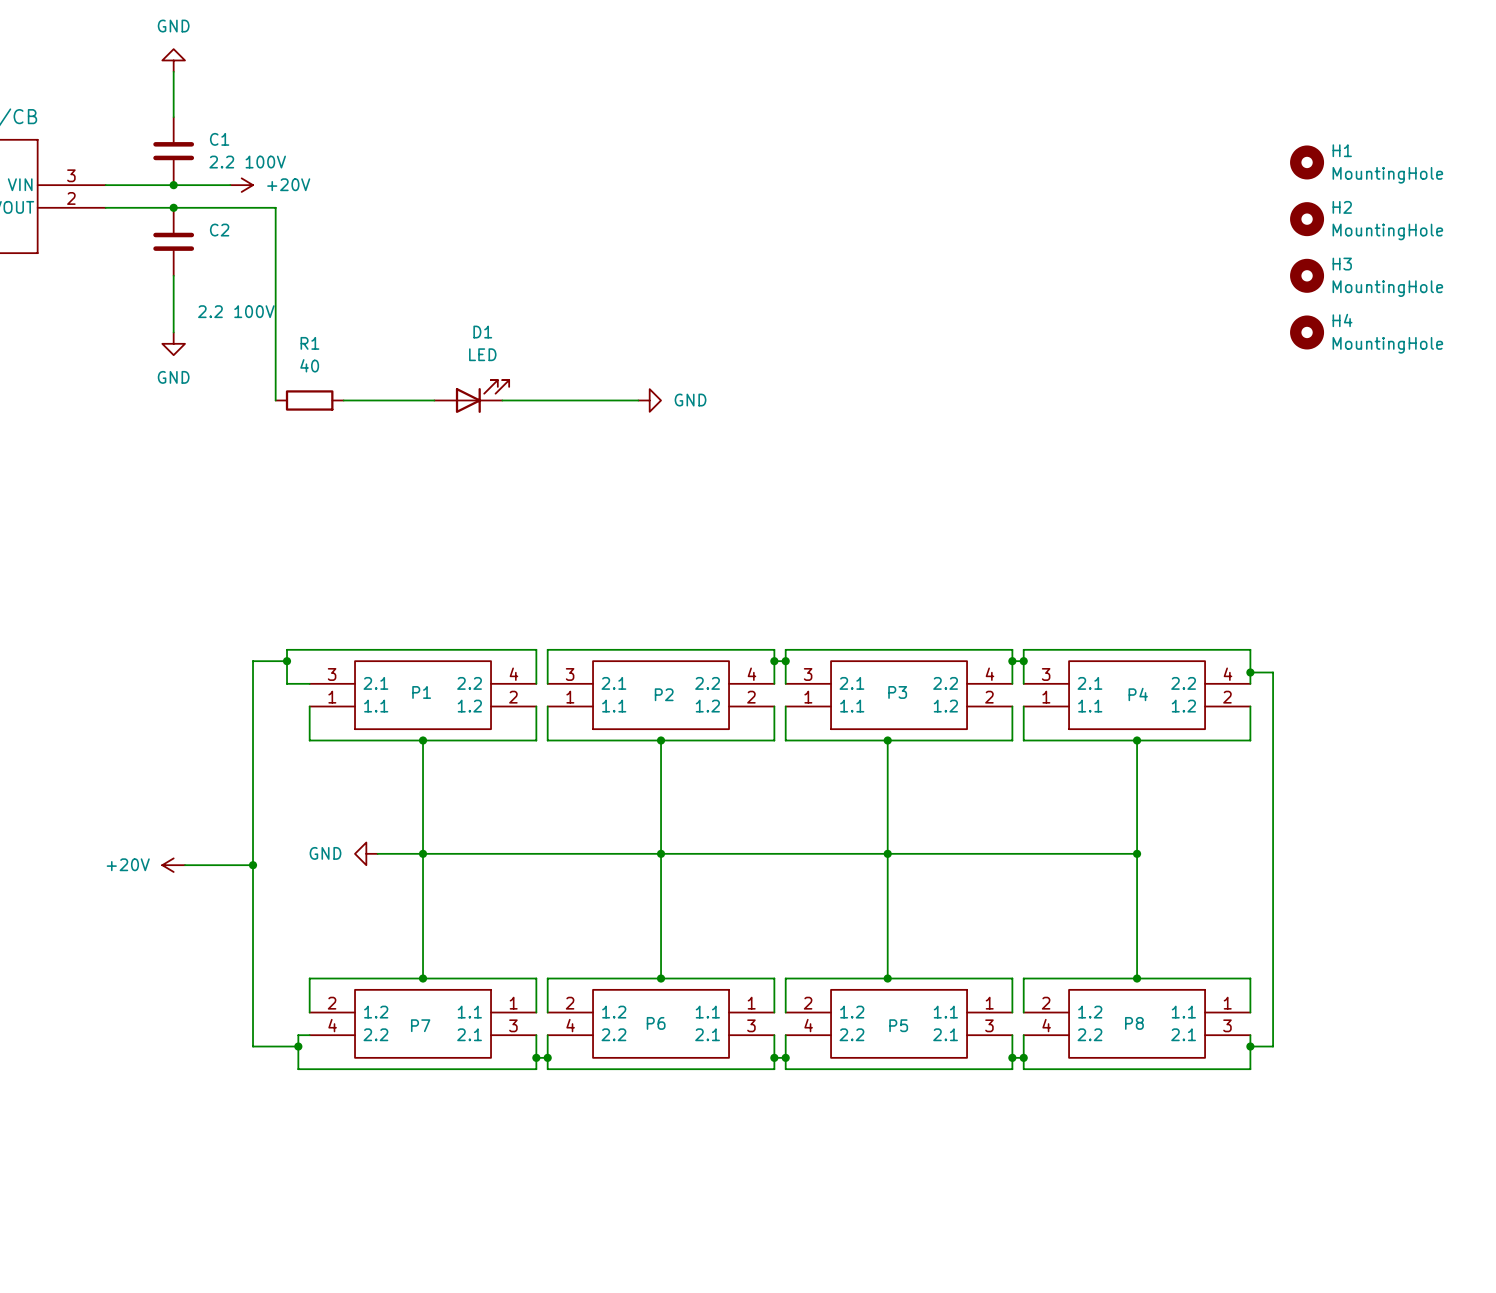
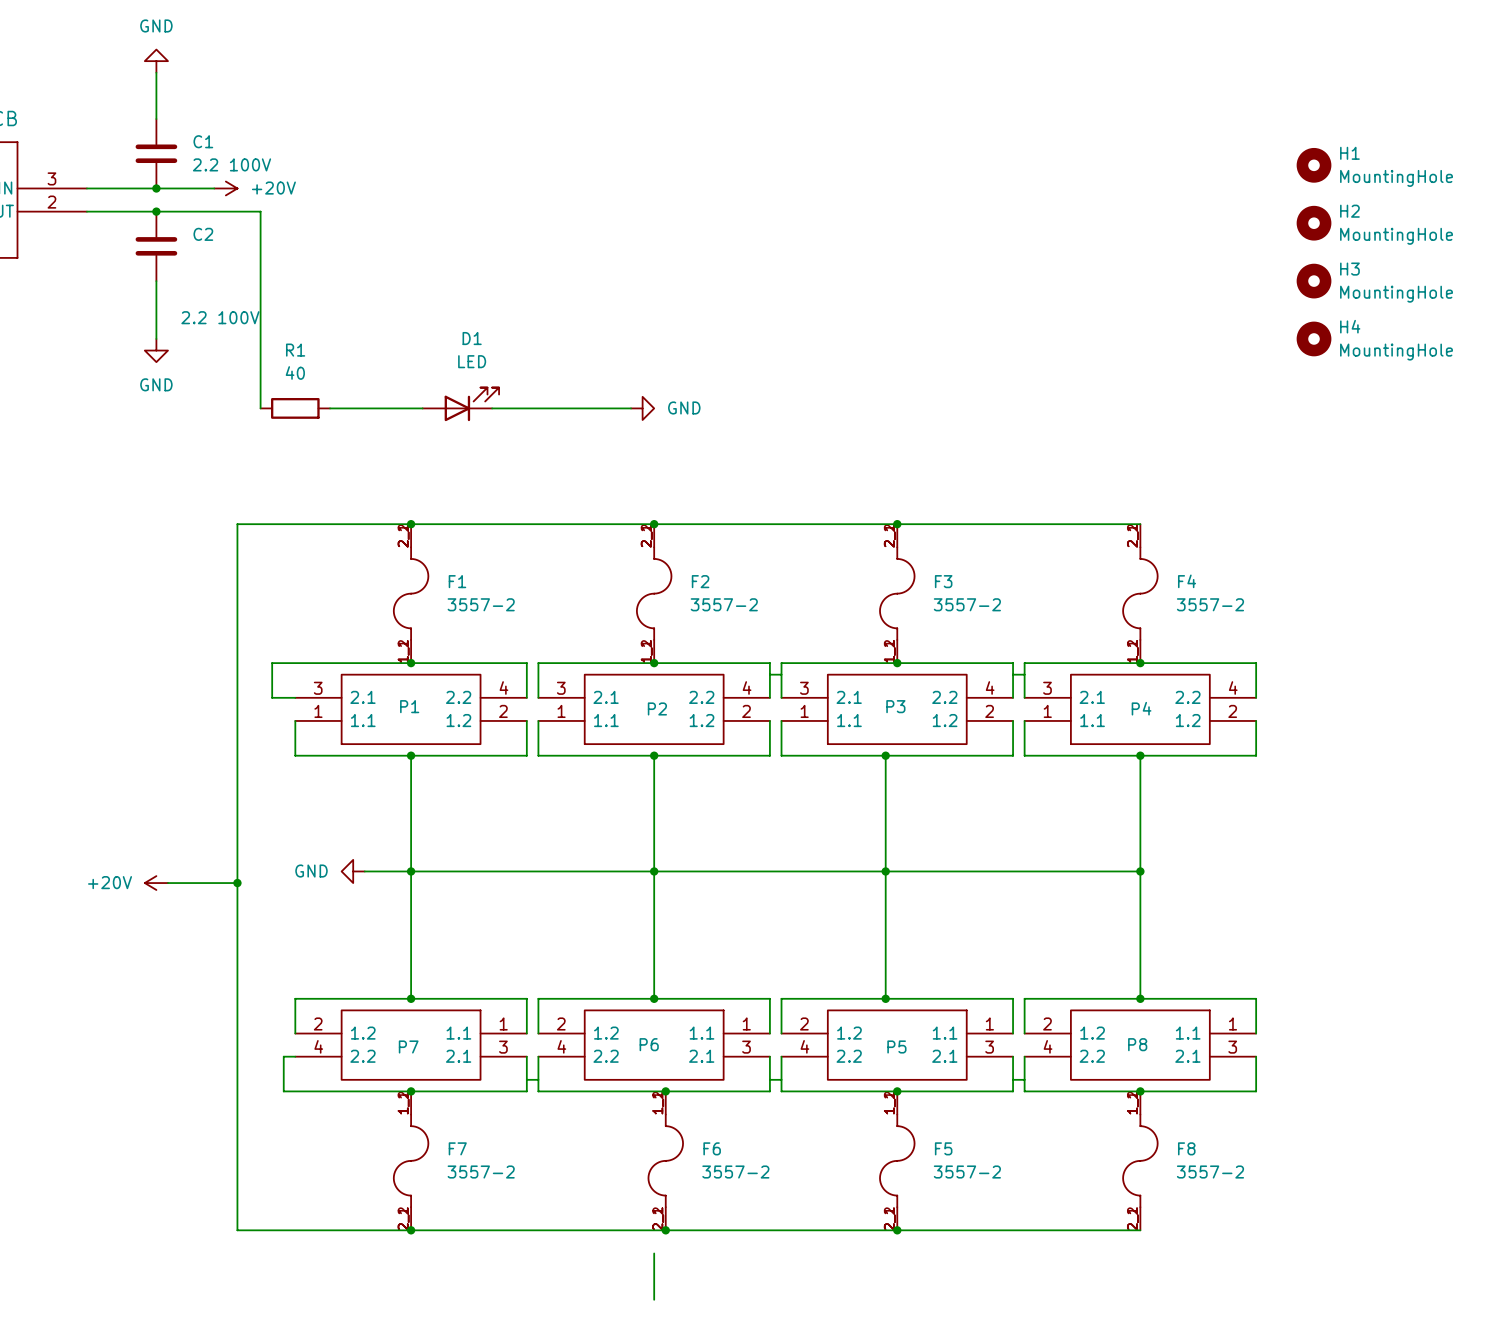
junction: none -> (411, 524)
junction: none -> (654, 524)
junction: none -> (897, 524)
F1: none -> 3557-2 (411, 593)
F2: none -> 3557-2 (654, 593)
F3: none -> 3557-2 (897, 593)
F4: none -> 3557-2 (1140, 593)
junction: none -> (411, 663)
junction: none -> (654, 663)
junction: none -> (897, 663)
junction: none -> (1140, 663)
wire: (253, 661) (287, 661) -> (237, 674) (237, 524) (1140, 524)
junction: (287, 661) -> none
junction: (774, 661) -> none
junction: (785, 661) -> none
junction: (1012, 661) -> none
junction: (1023, 661) -> none
wire: (1250, 672) (1273, 672) (1273, 1046) (1250, 1046) -> none
junction: (1250, 672) -> none
wire: (253, 1046) (298, 1046) -> (237, 1068) (237, 1230) (1140, 1230)
junction: (298, 1046) -> none
junction: (1250, 1046) -> none
junction: (536, 1057) -> none
junction: (547, 1057) -> none
junction: (774, 1057) -> none
junction: (785, 1057) -> none
junction: (1012, 1057) -> none
junction: (1023, 1057) -> none
junction: none -> (411, 1091)
junction: none -> (665, 1091)
junction: none -> (897, 1091)
junction: none -> (1140, 1091)
F7: none -> 3557-2 (411, 1160)
F6: none -> 3557-2 (665, 1160)
F5: none -> 3557-2 (897, 1160)
F8: none -> 3557-2 (1140, 1160)
junction: none -> (411, 1230)
junction: none -> (665, 1230)
junction: none -> (897, 1230)
wire: none -> (654, 1253) (654, 1299)

